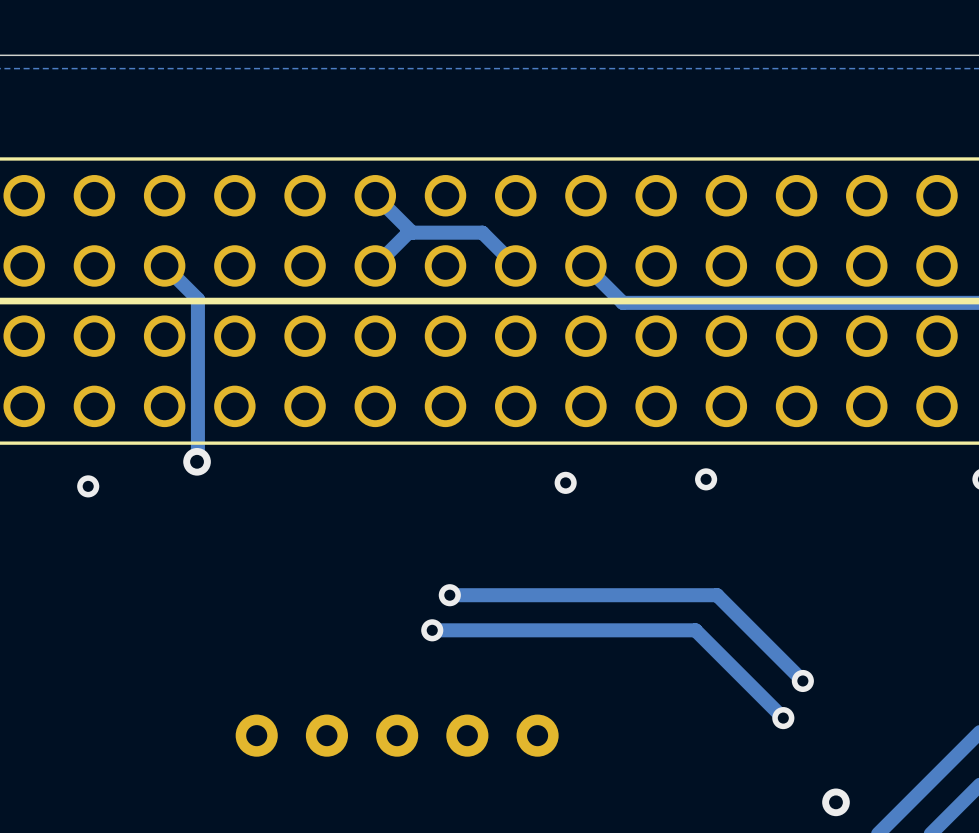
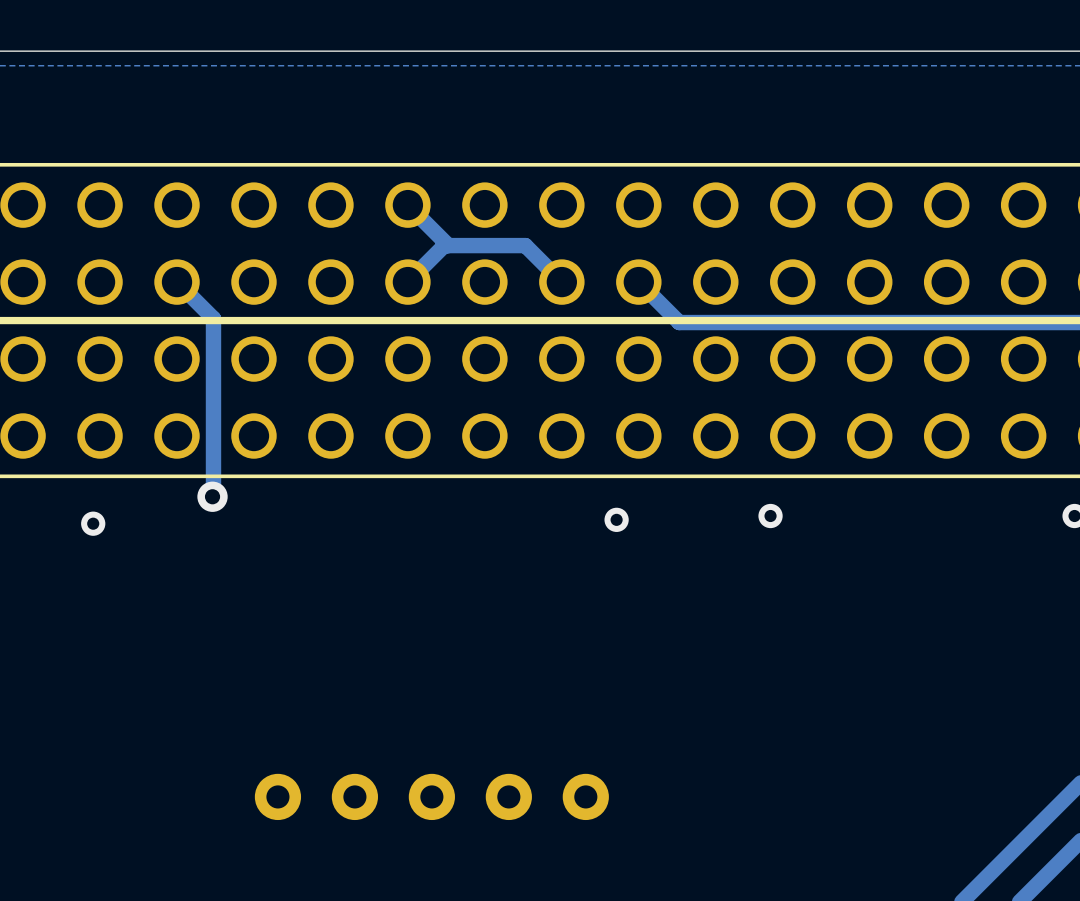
track: (449, 595) (717, 595) (802, 680) -> none
via: (449, 595) -> none
track: (432, 630) (695, 630) (783, 718) -> none
via: (432, 630) -> none
via: (802, 680) -> none
via: (783, 718) -> none
via: (835, 802) -> none

